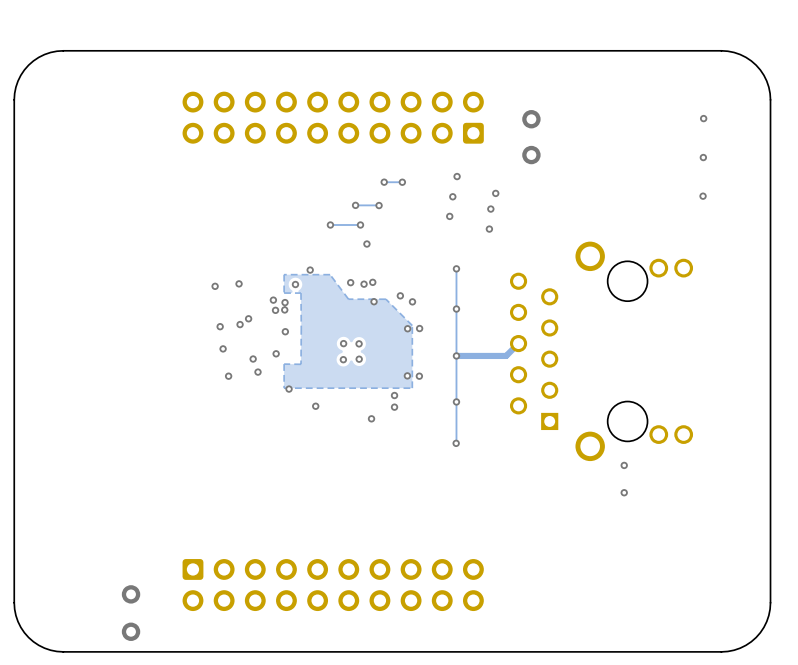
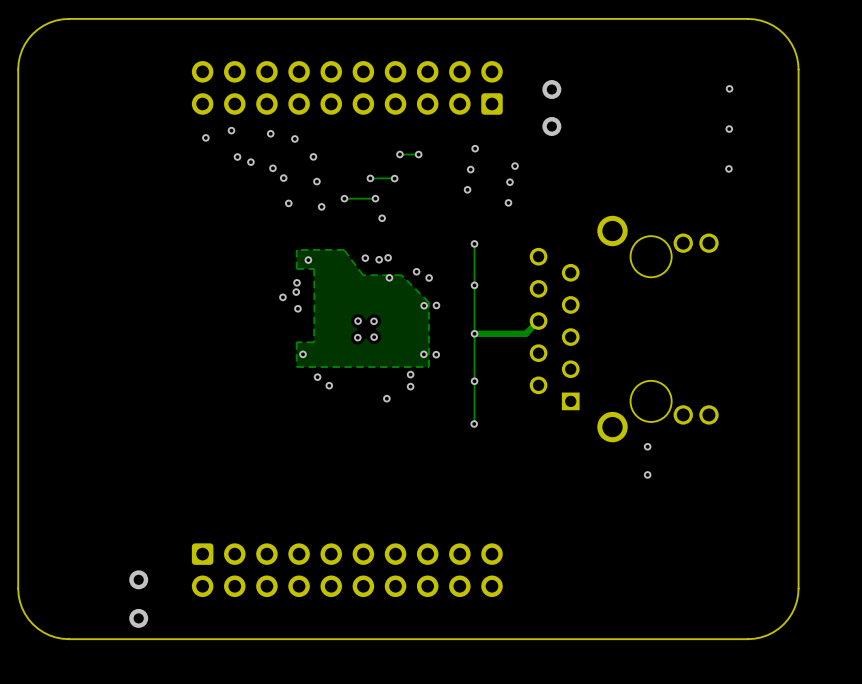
via: none -> (231, 130)
via: none -> (270, 133)
via: none -> (205, 137)
via: none -> (294, 138)
via: none -> (237, 157)
via: none -> (313, 156)
via: none -> (250, 162)
via: none -> (272, 168)
via: none -> (283, 178)
via: none -> (316, 181)
via: none -> (288, 203)
via: none -> (321, 206)
via: (310, 270) -> none
via: (239, 283) -> none
via: (215, 286) -> none
via: (273, 300) -> none
via: (285, 302) -> none
via: none -> (296, 282)
via: (284, 309) -> none
via: (275, 310) -> none
via: none -> (296, 292)
via: (248, 318) -> none
via: none -> (282, 297)
via: (240, 324) -> none
via: (220, 326) -> none
via: (223, 348) -> none
via: (276, 353) -> none
via: (253, 359) -> none
via: (257, 372) -> none
via: none -> (303, 354)
via: (228, 376) -> none
via: (289, 389) -> none
via: none -> (317, 377)

